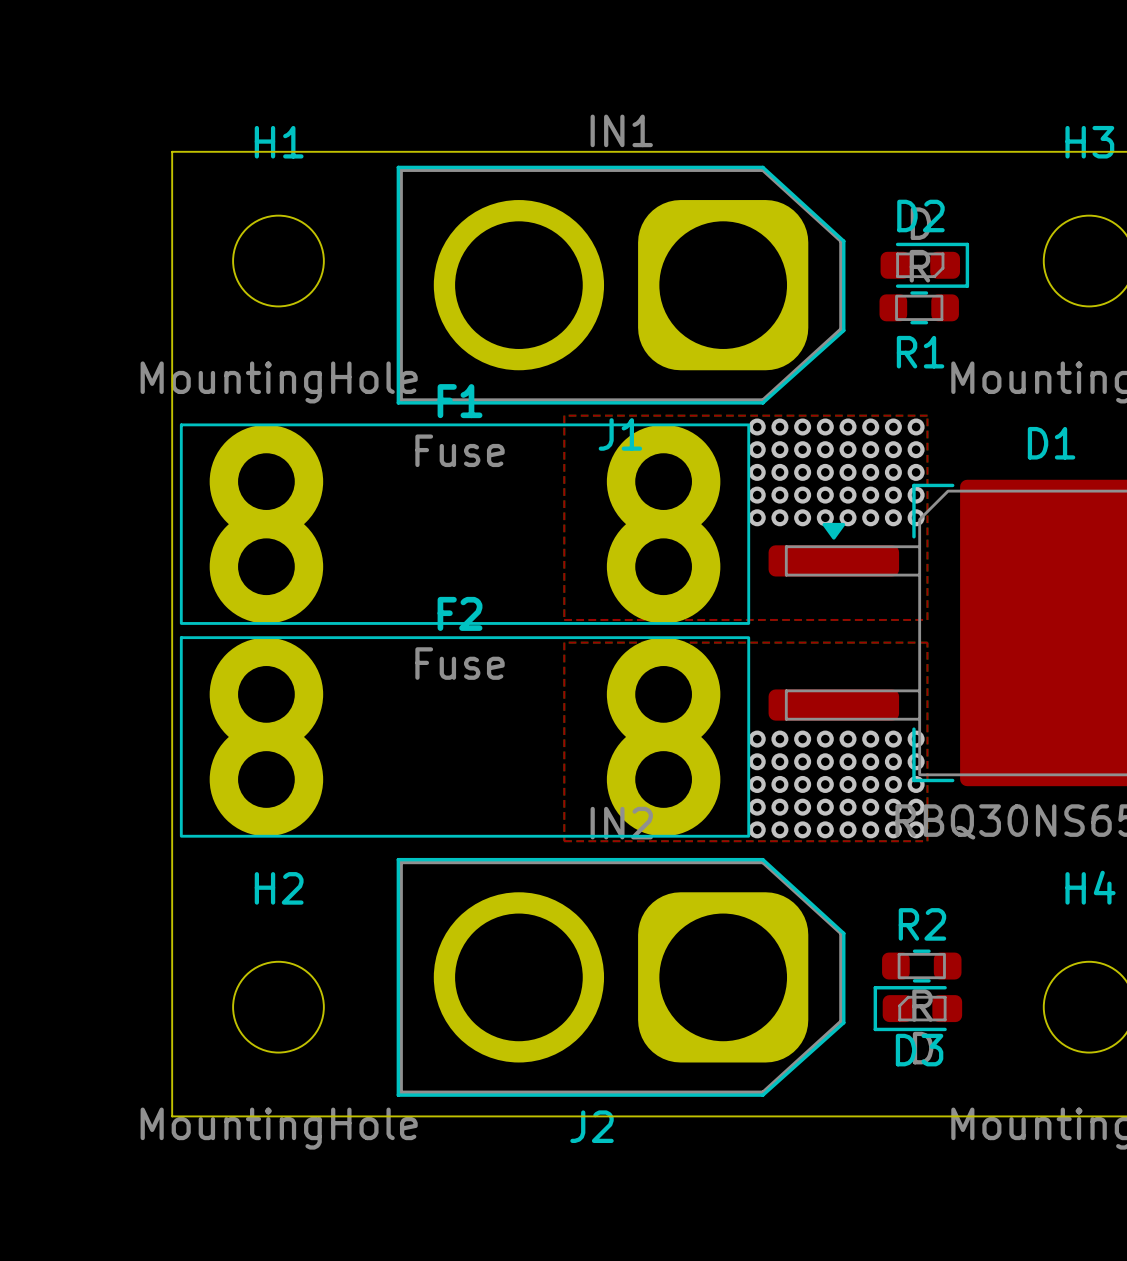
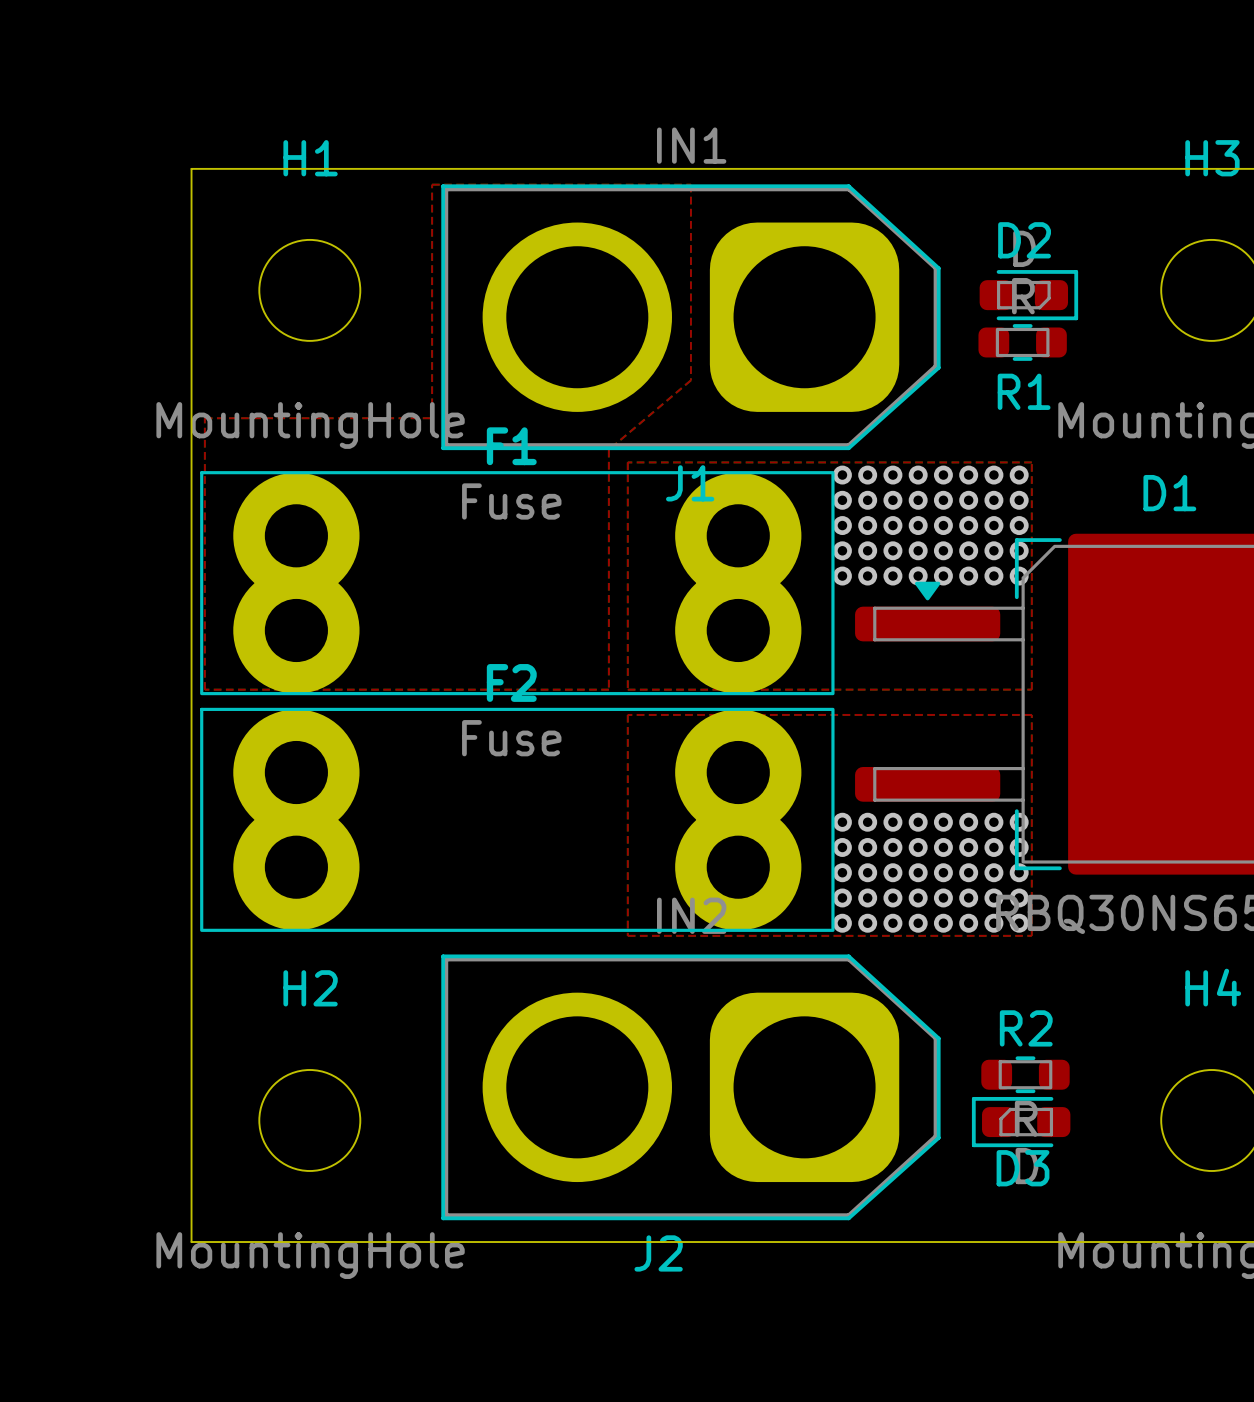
top zone outline: none -> (432, 184) (432, 418) (204, 418) (204, 689) (608, 689) (608, 449) (690, 380) (690, 184) (432, 184)

